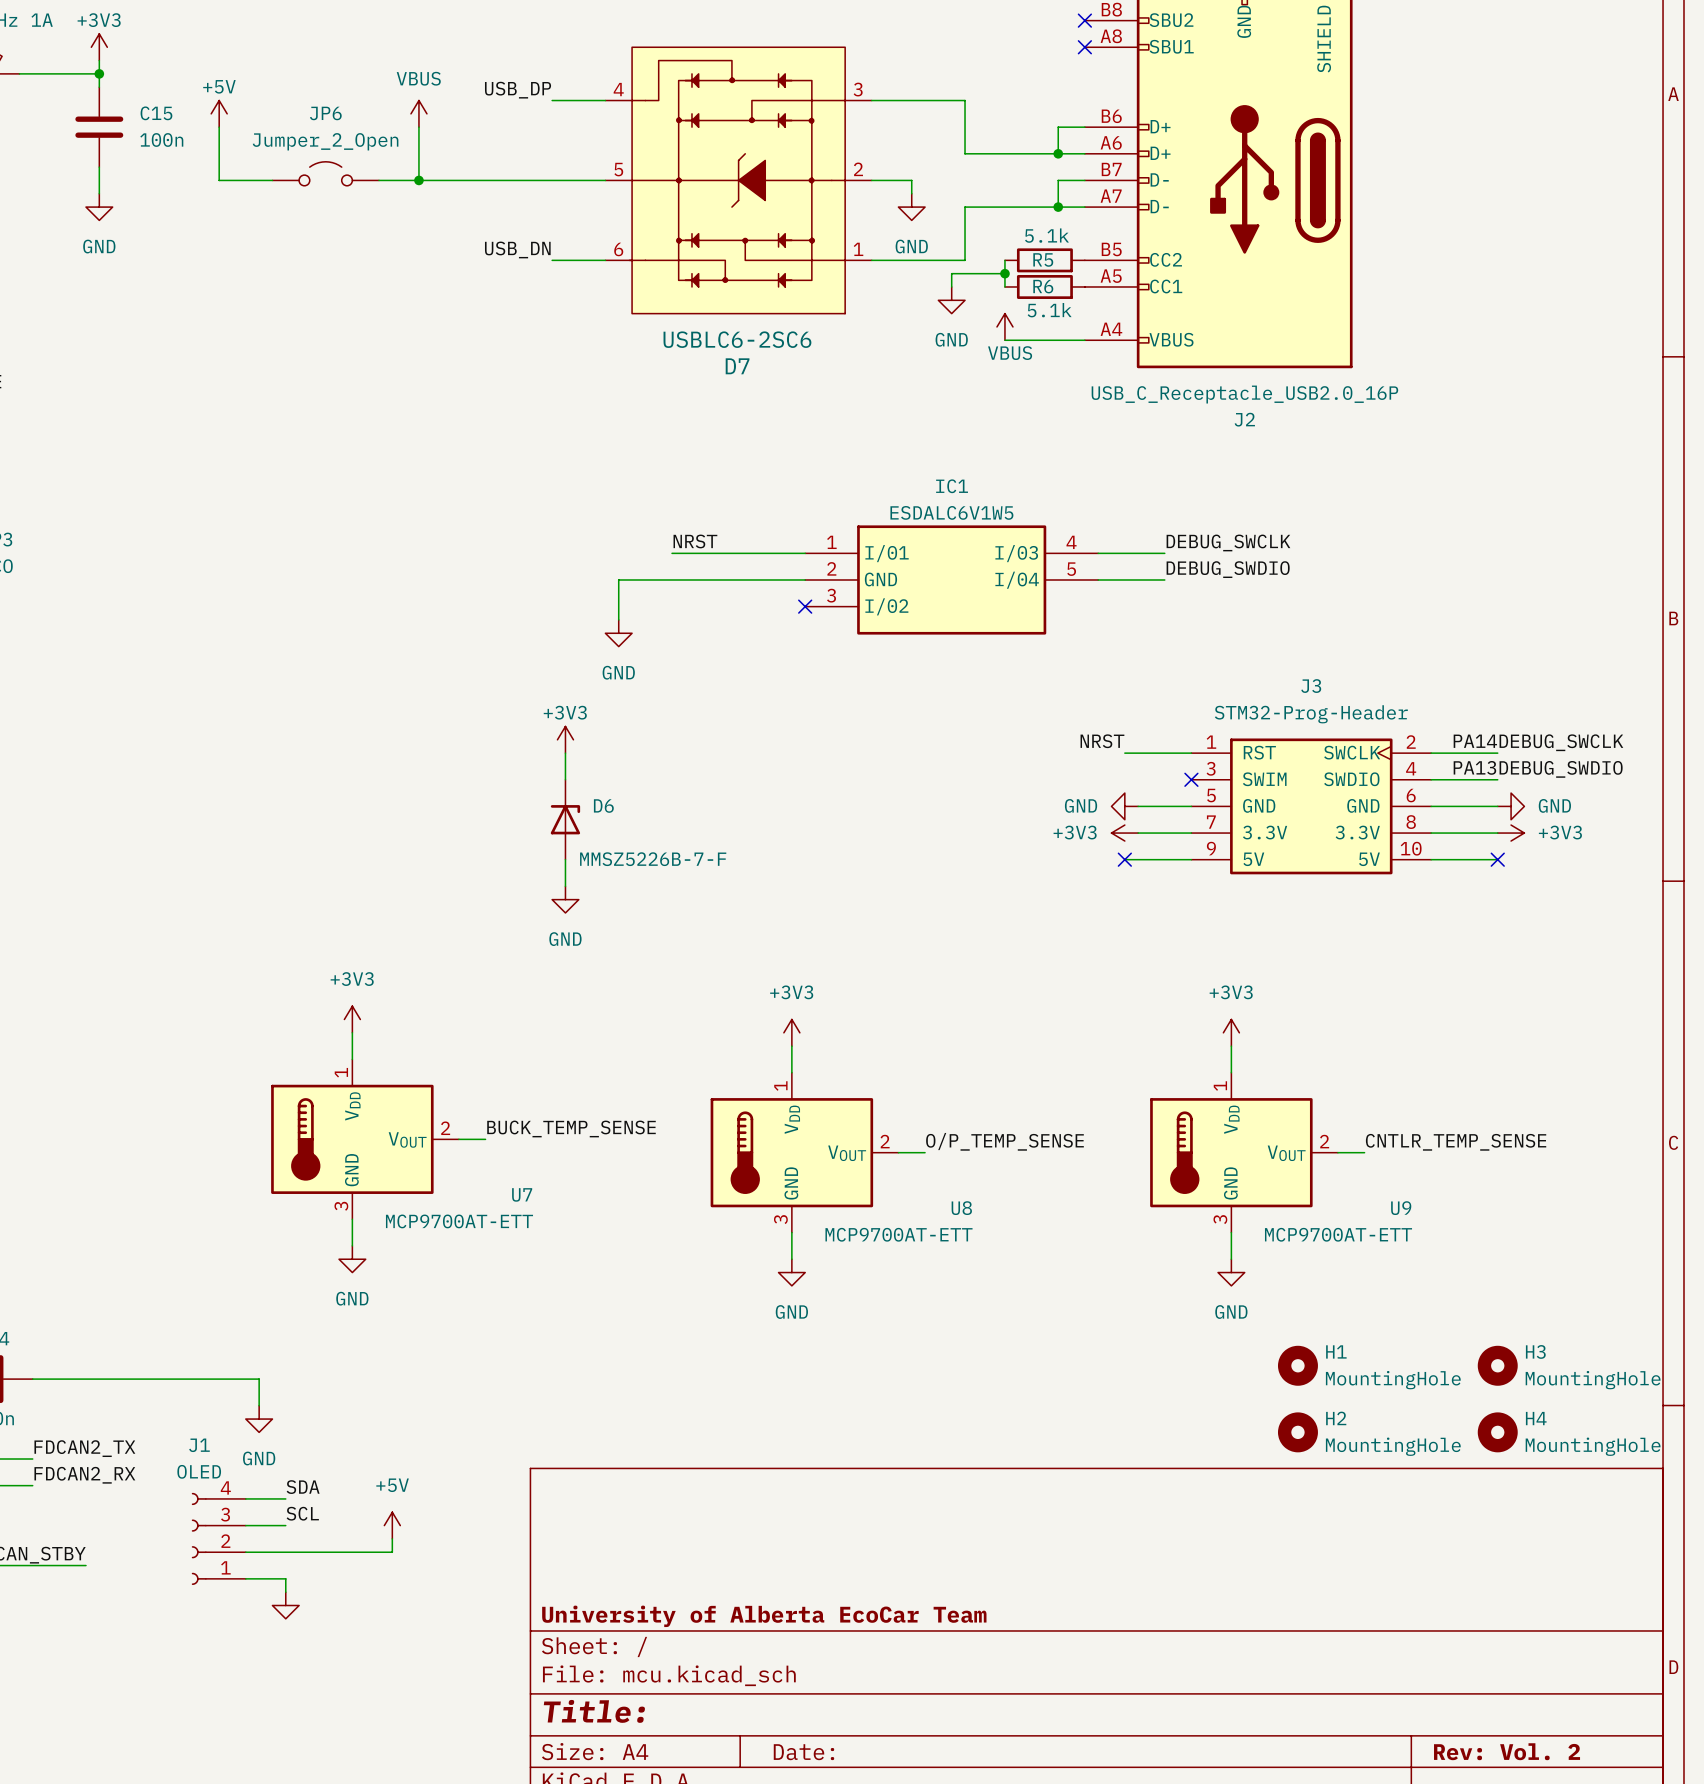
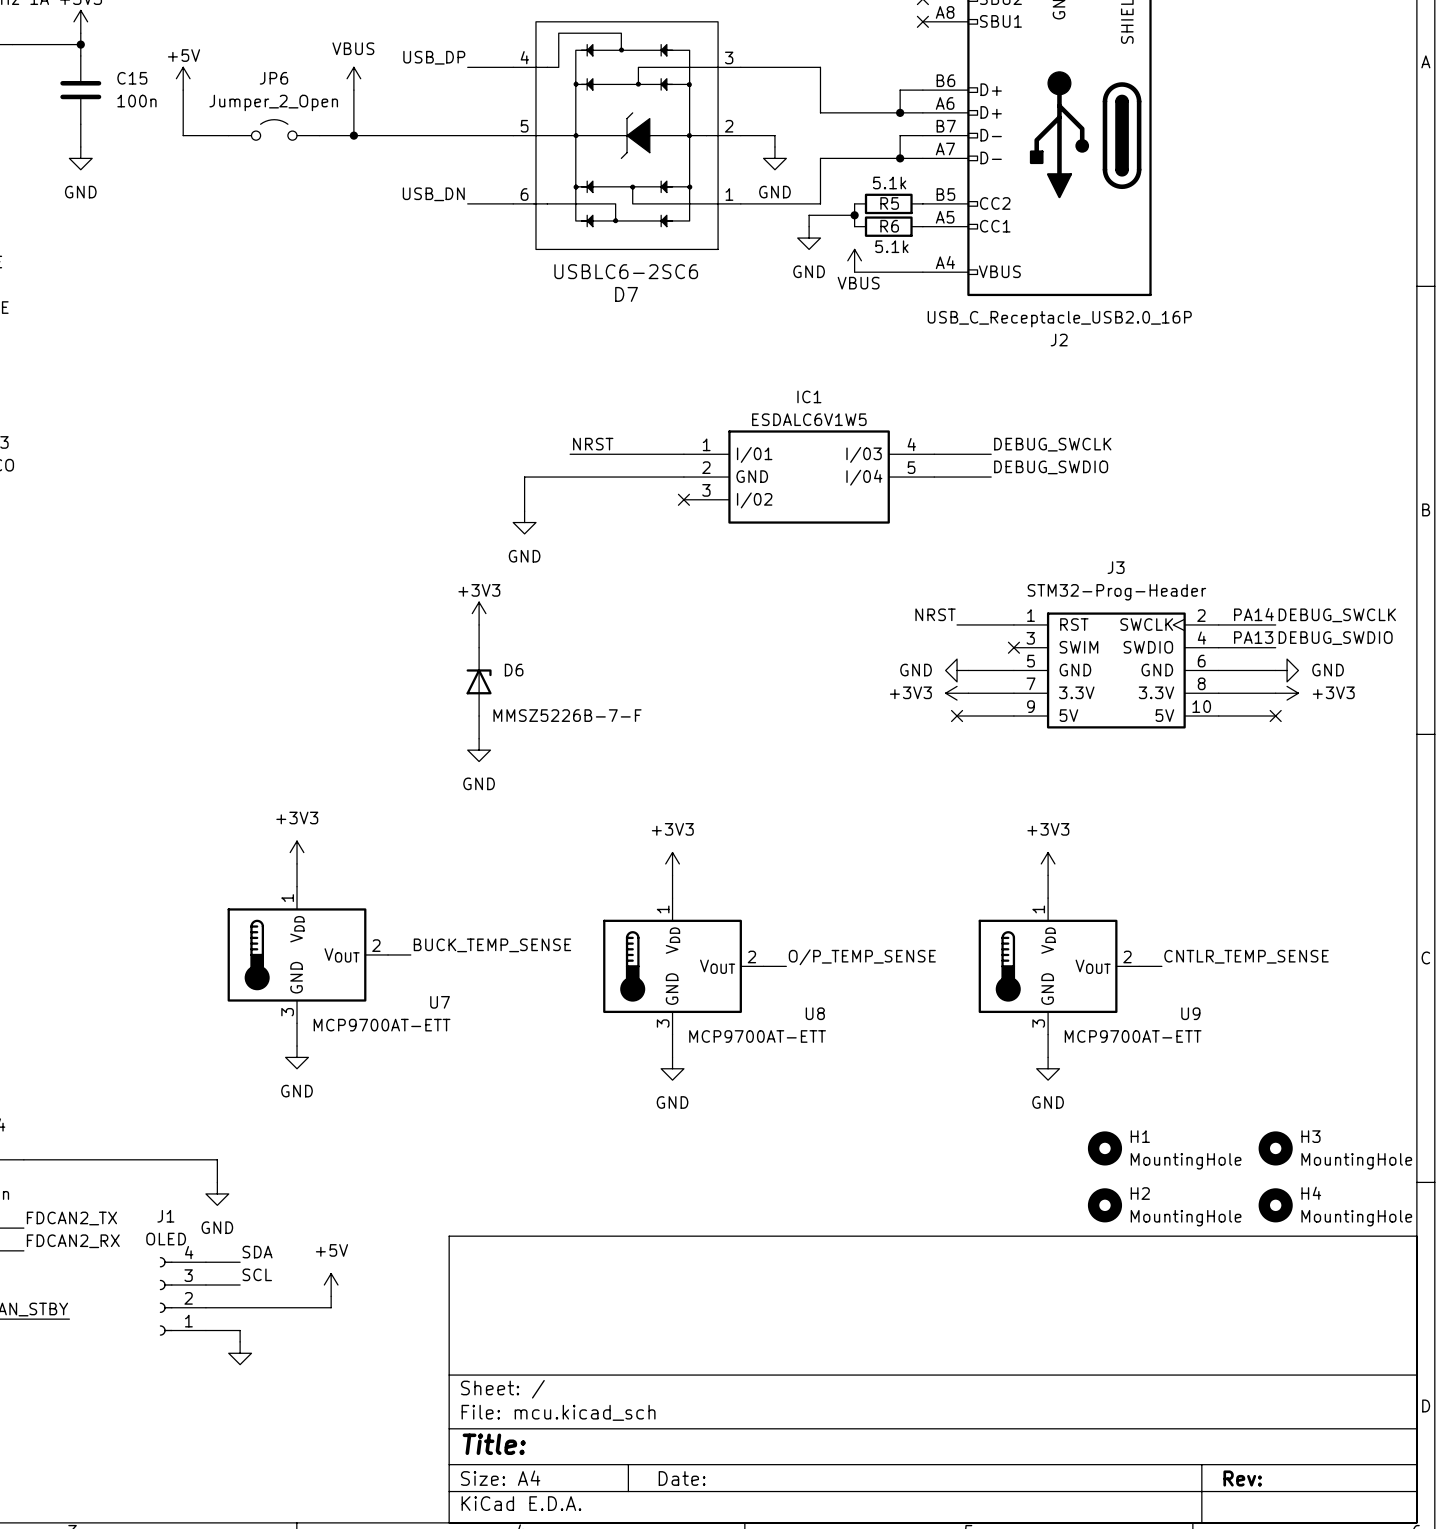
title block: University of Alberta EcoCar Team (764, 1616) -> none
title block: Rev: Vol. 2 (1507, 1751) -> Rev: (1242, 1478)

